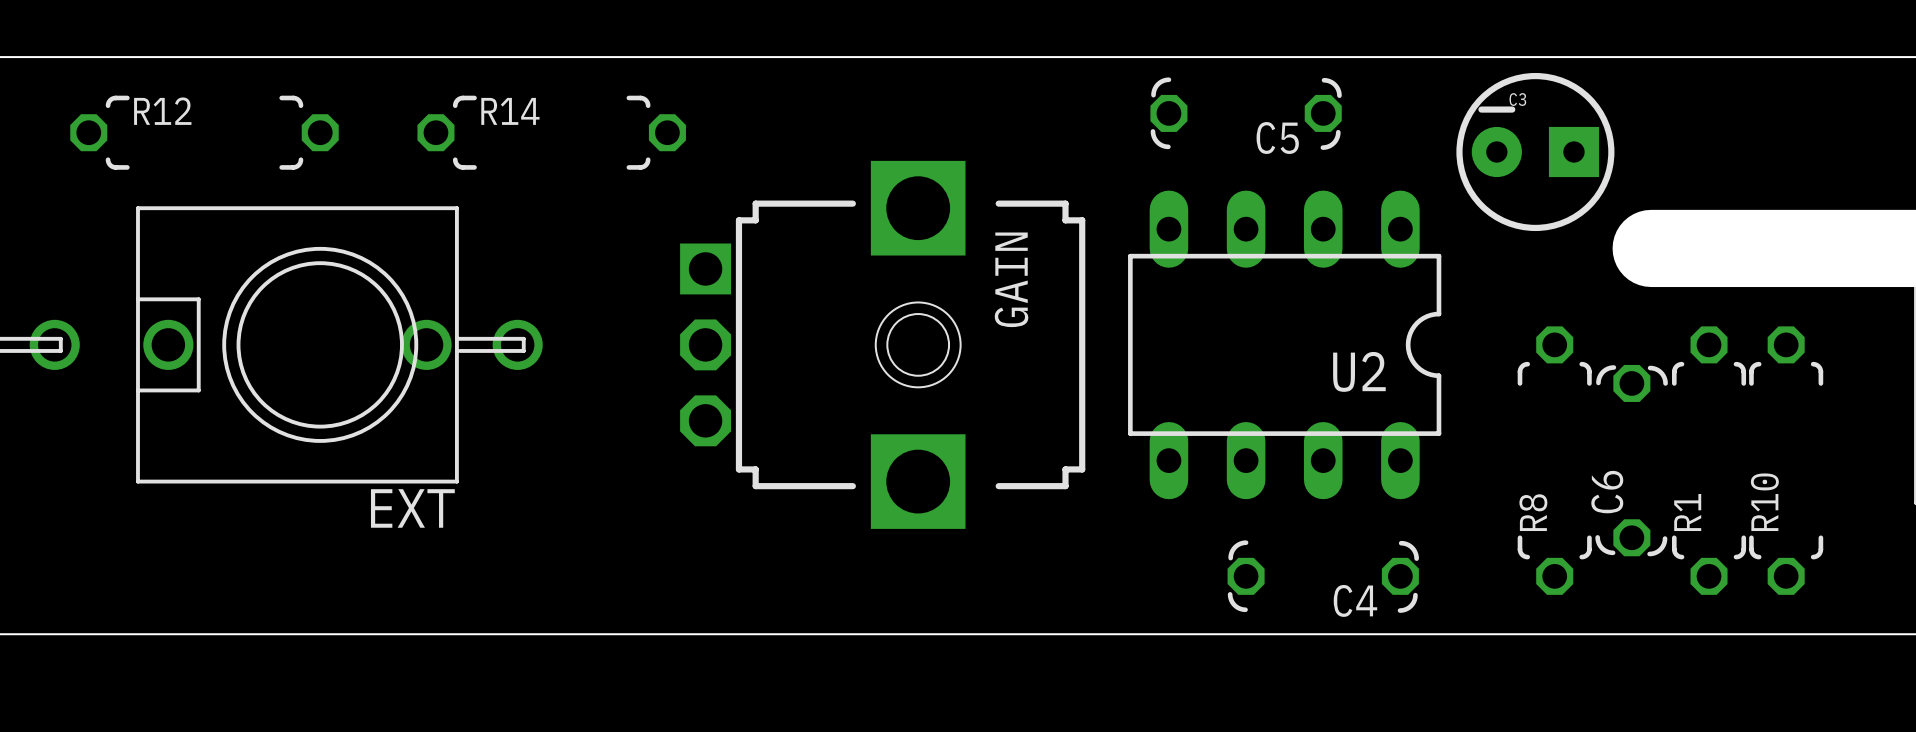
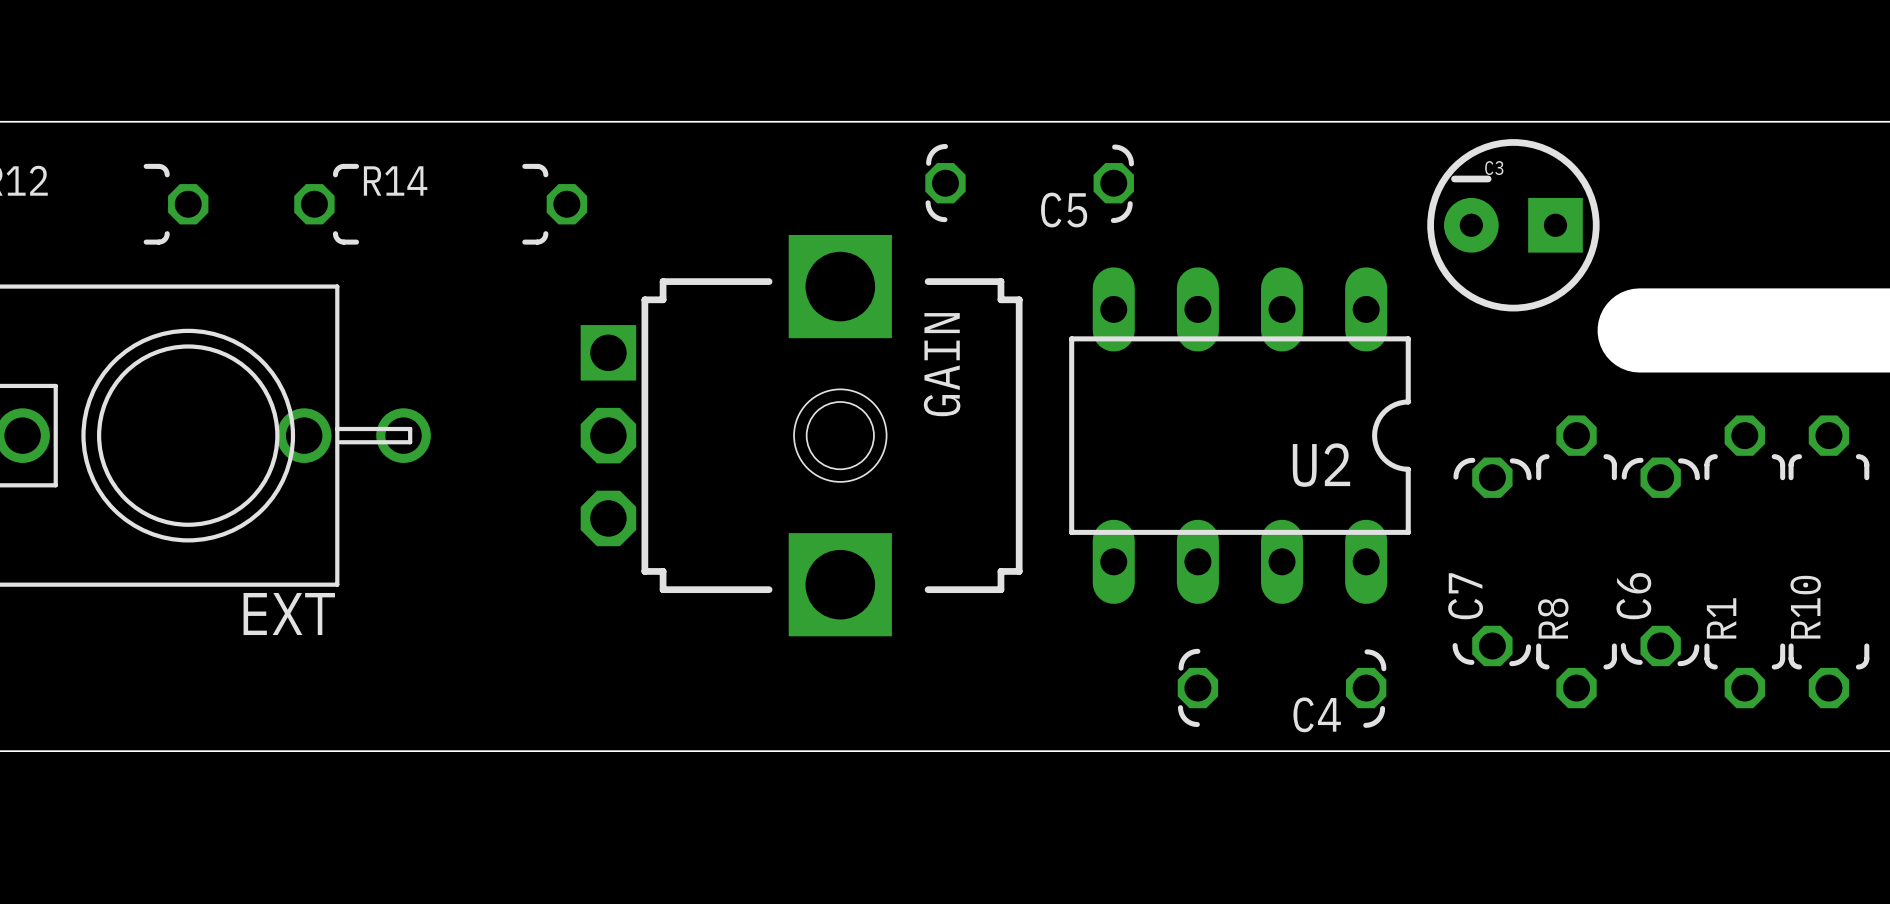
C5 position: (1246, 113) -> (1029, 183)
C7: none -> (1492, 561)
R8 position: (1554, 460) -> (1576, 561)
C6 position: (1631, 460) -> (1660, 561)
R1 position: (1709, 460) -> (1744, 561)
R10 position: (1786, 460) -> (1828, 561)

